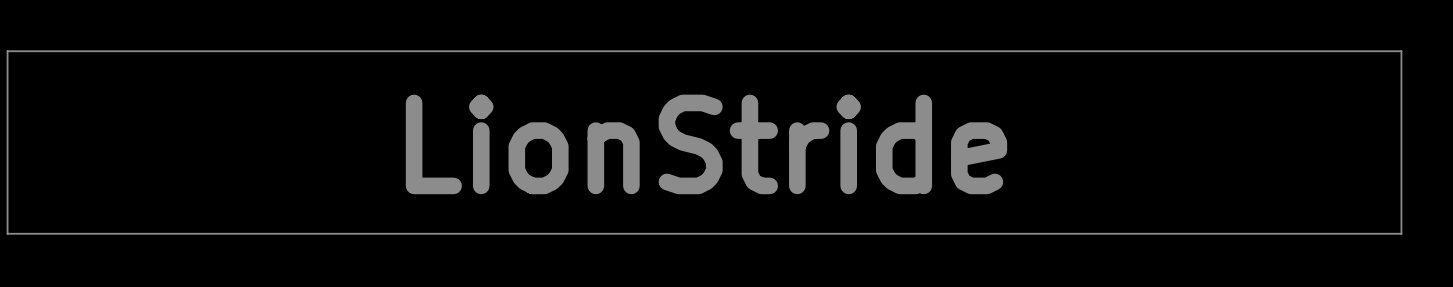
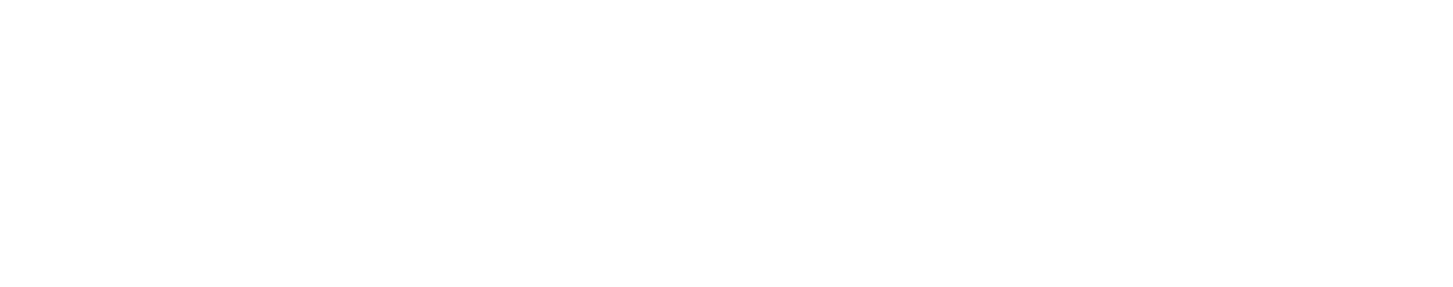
line: (7, 51) (1401, 51) (1401, 233) (7, 233) (7, 51) -> none
text: LionStride (706, 144) -> none

